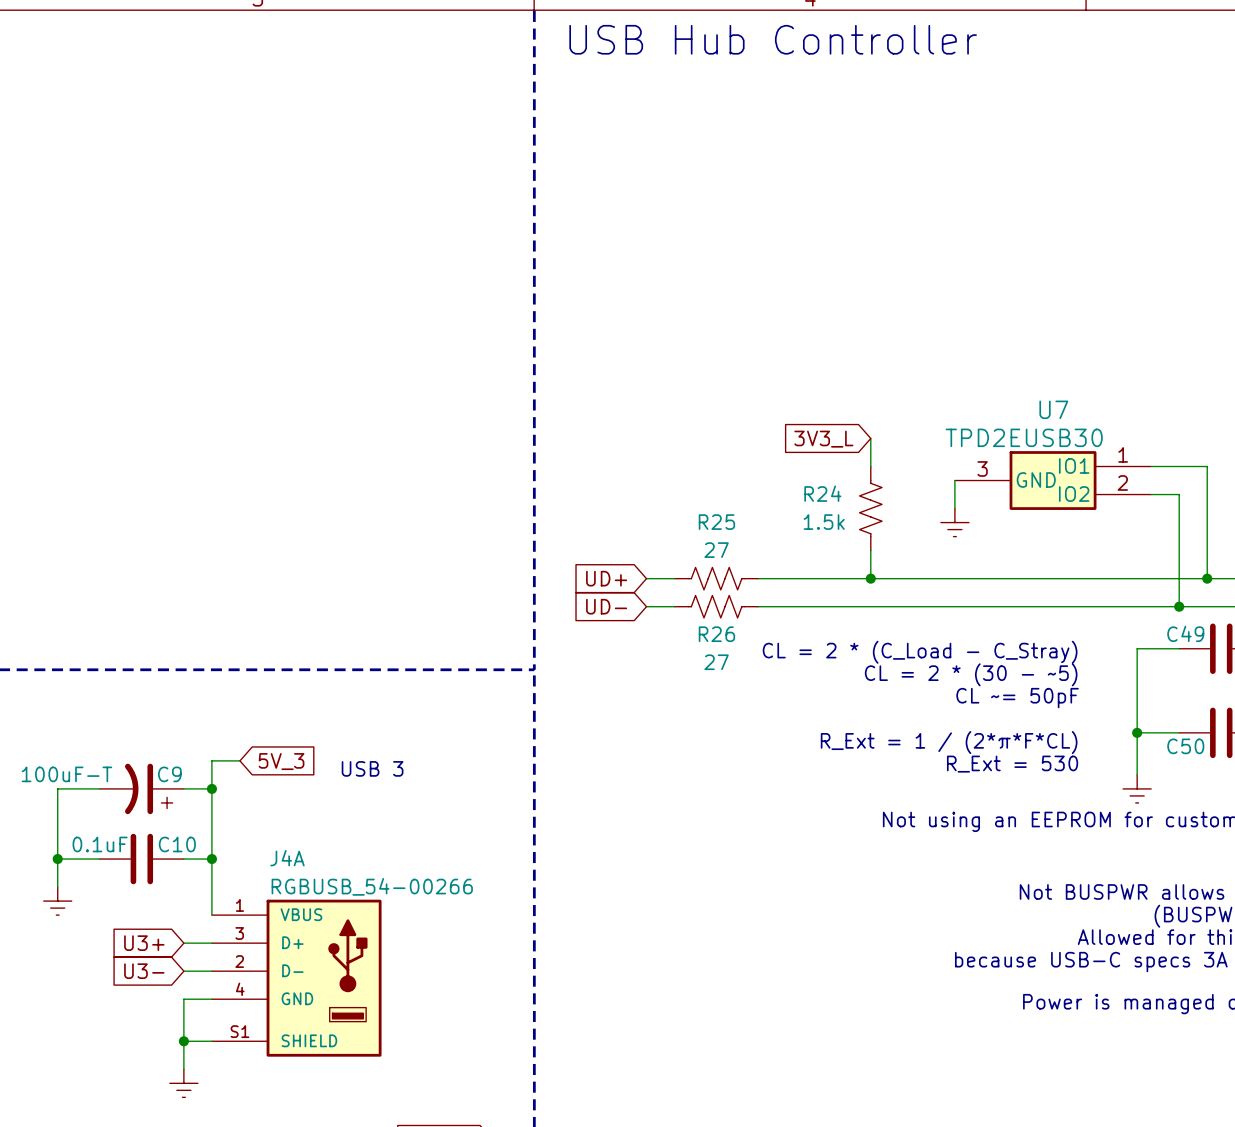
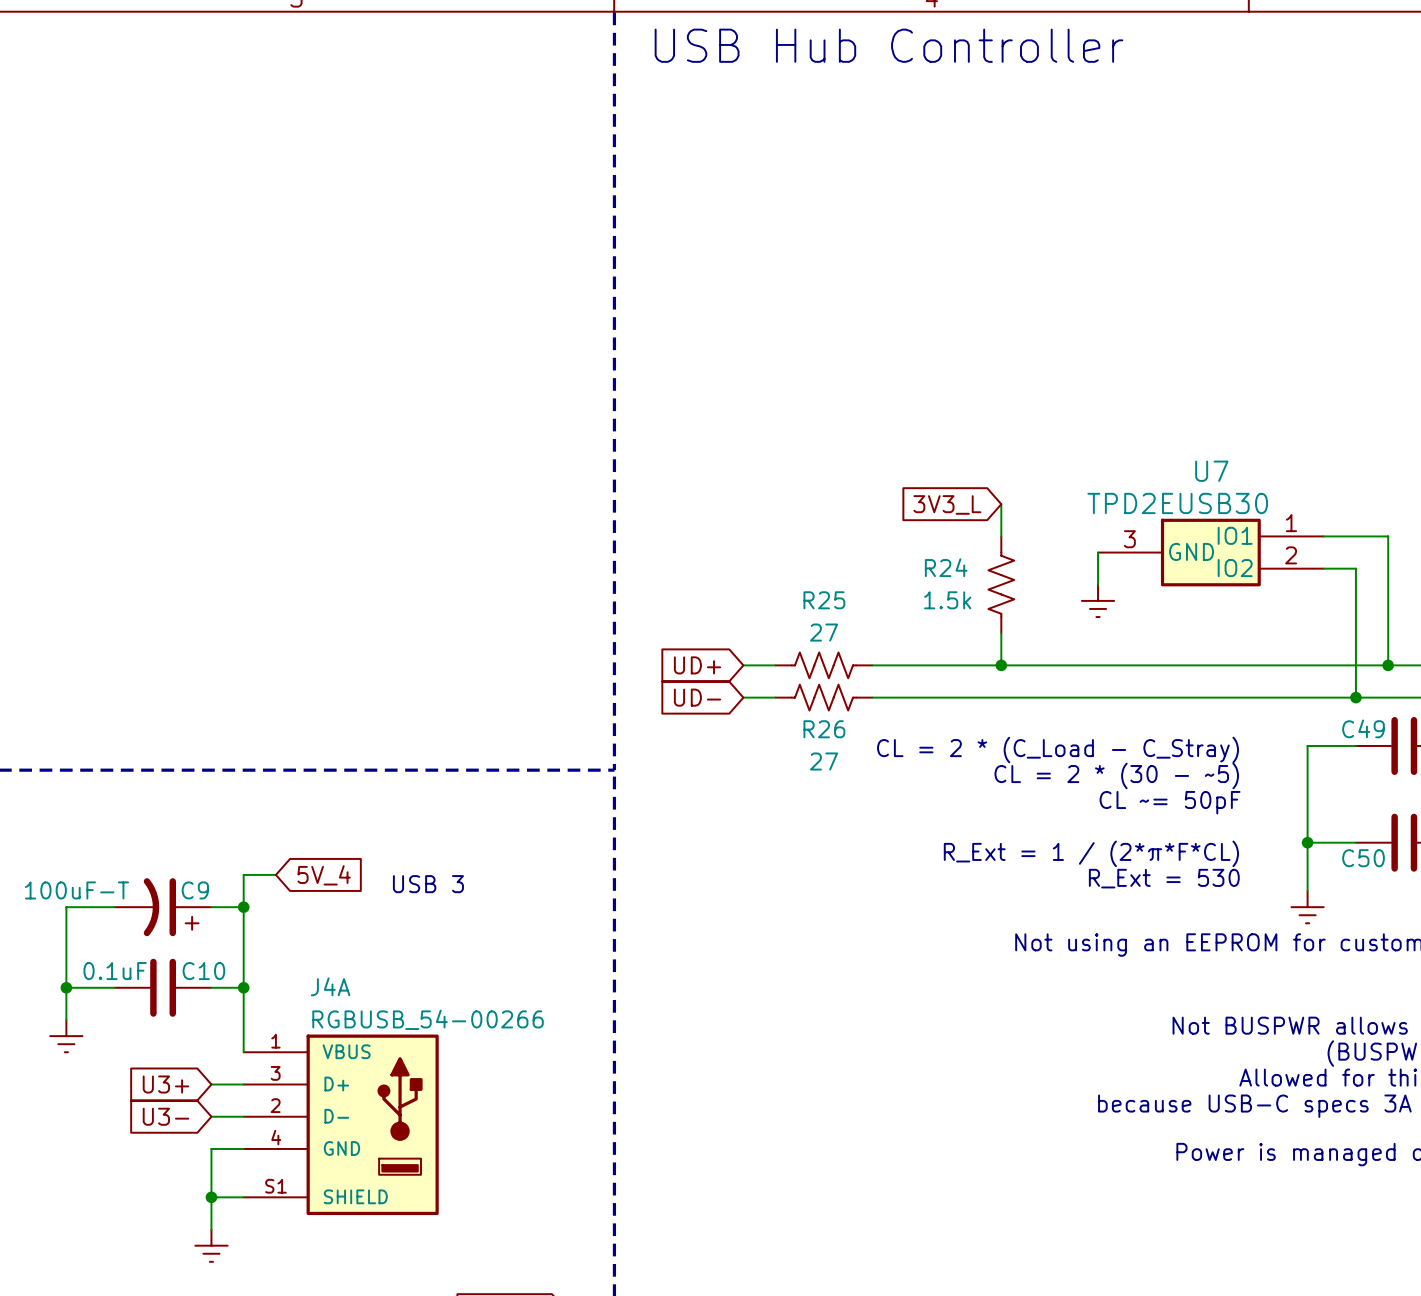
global label: 5V_3 (281, 761) -> 5V_4 (324, 875)

